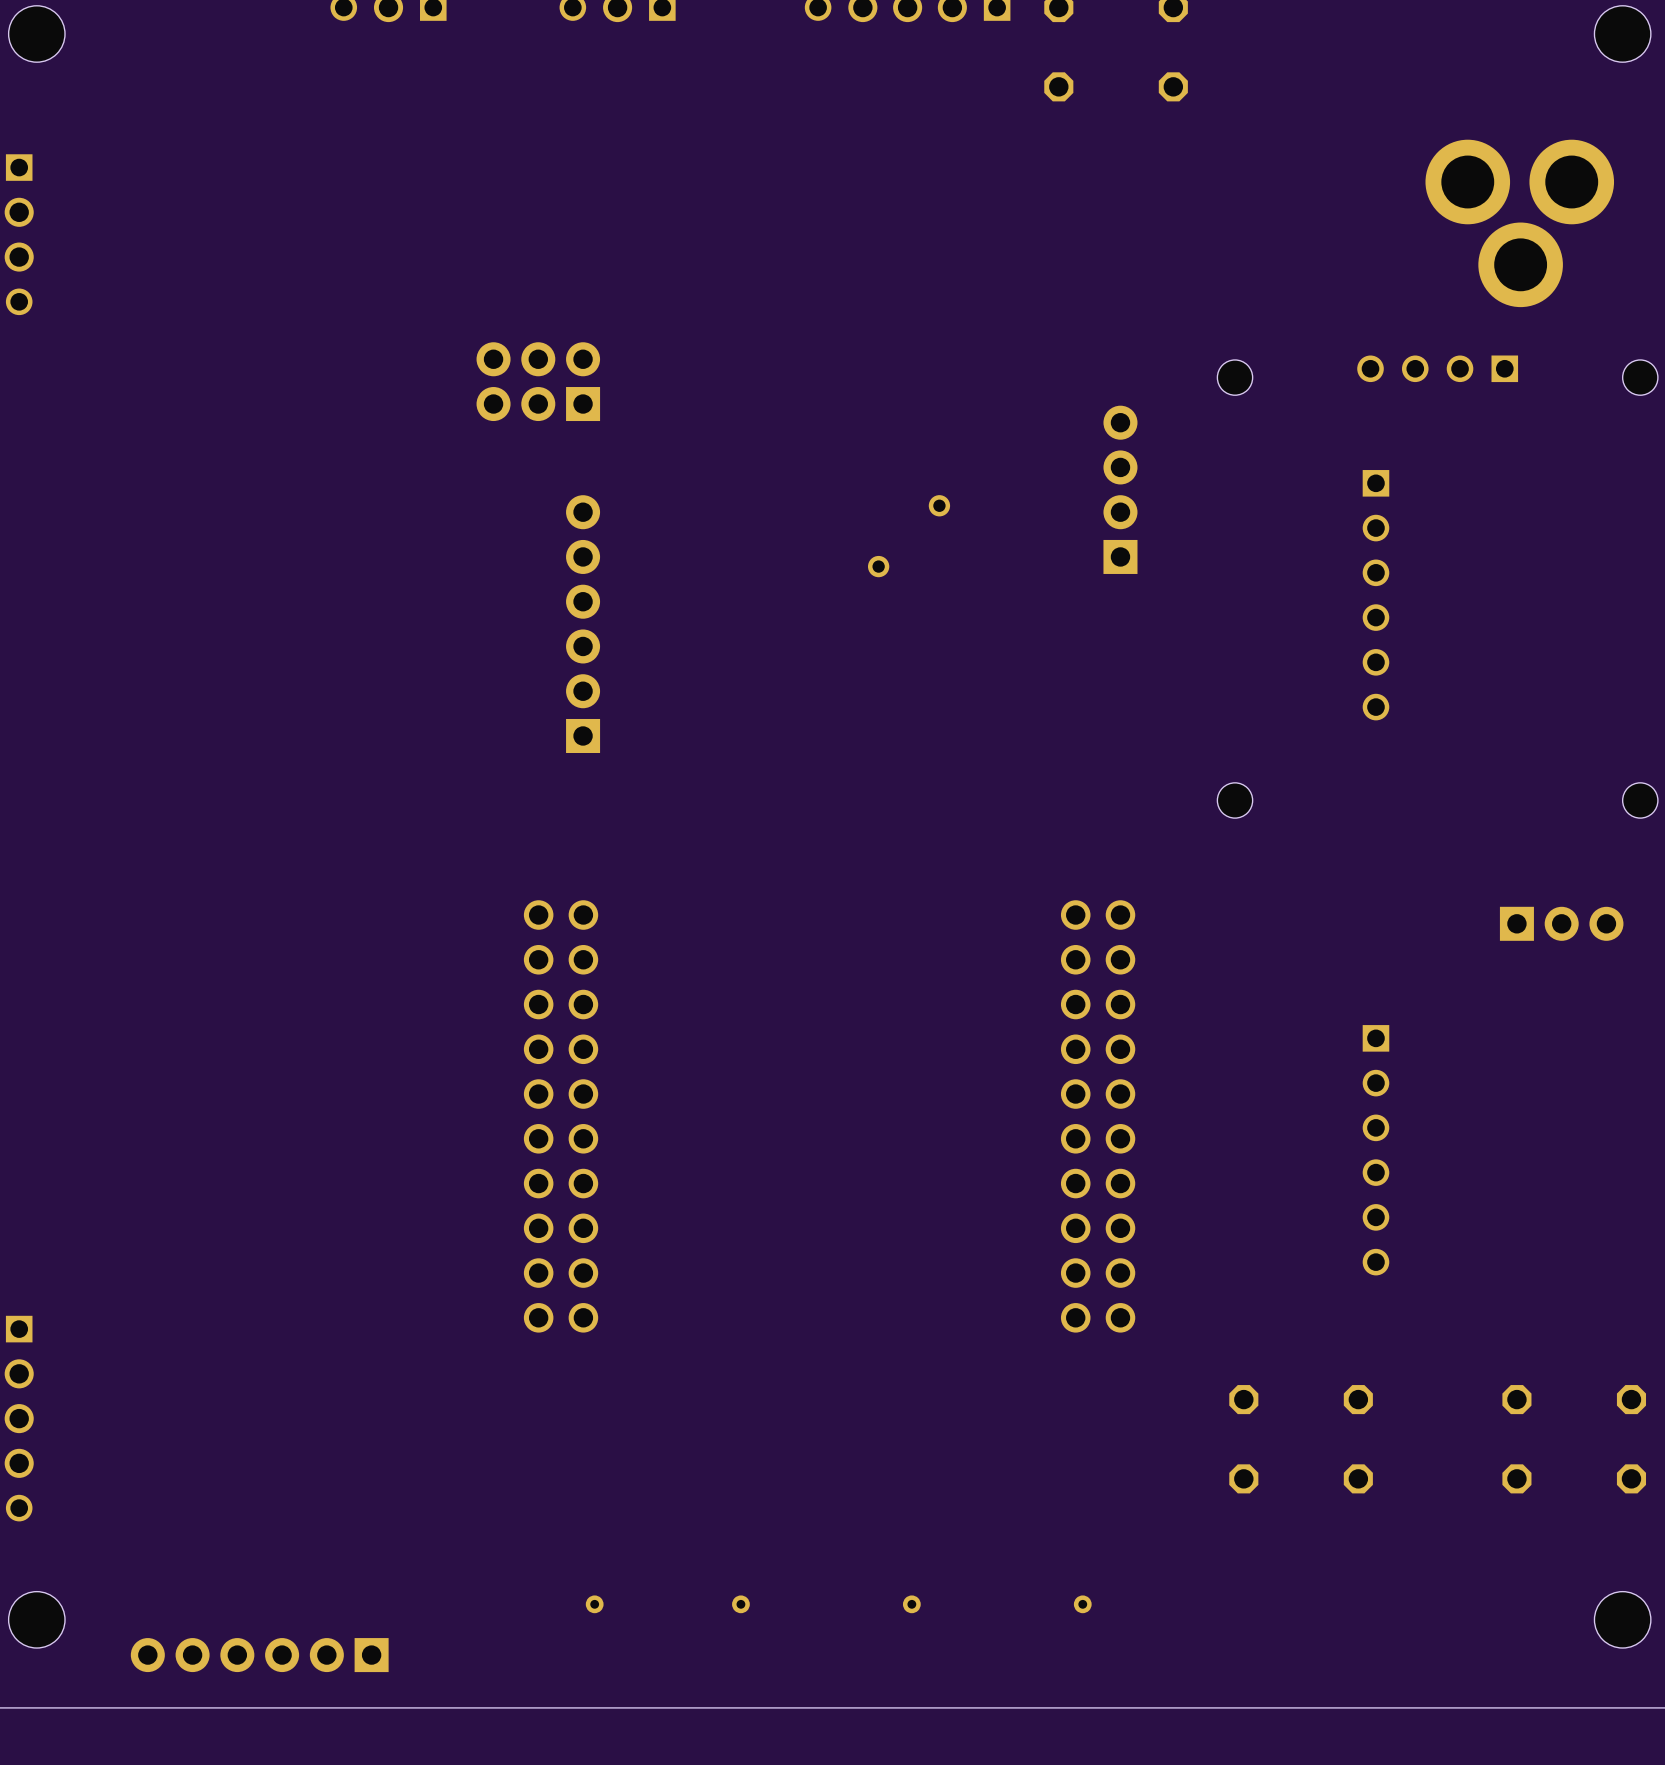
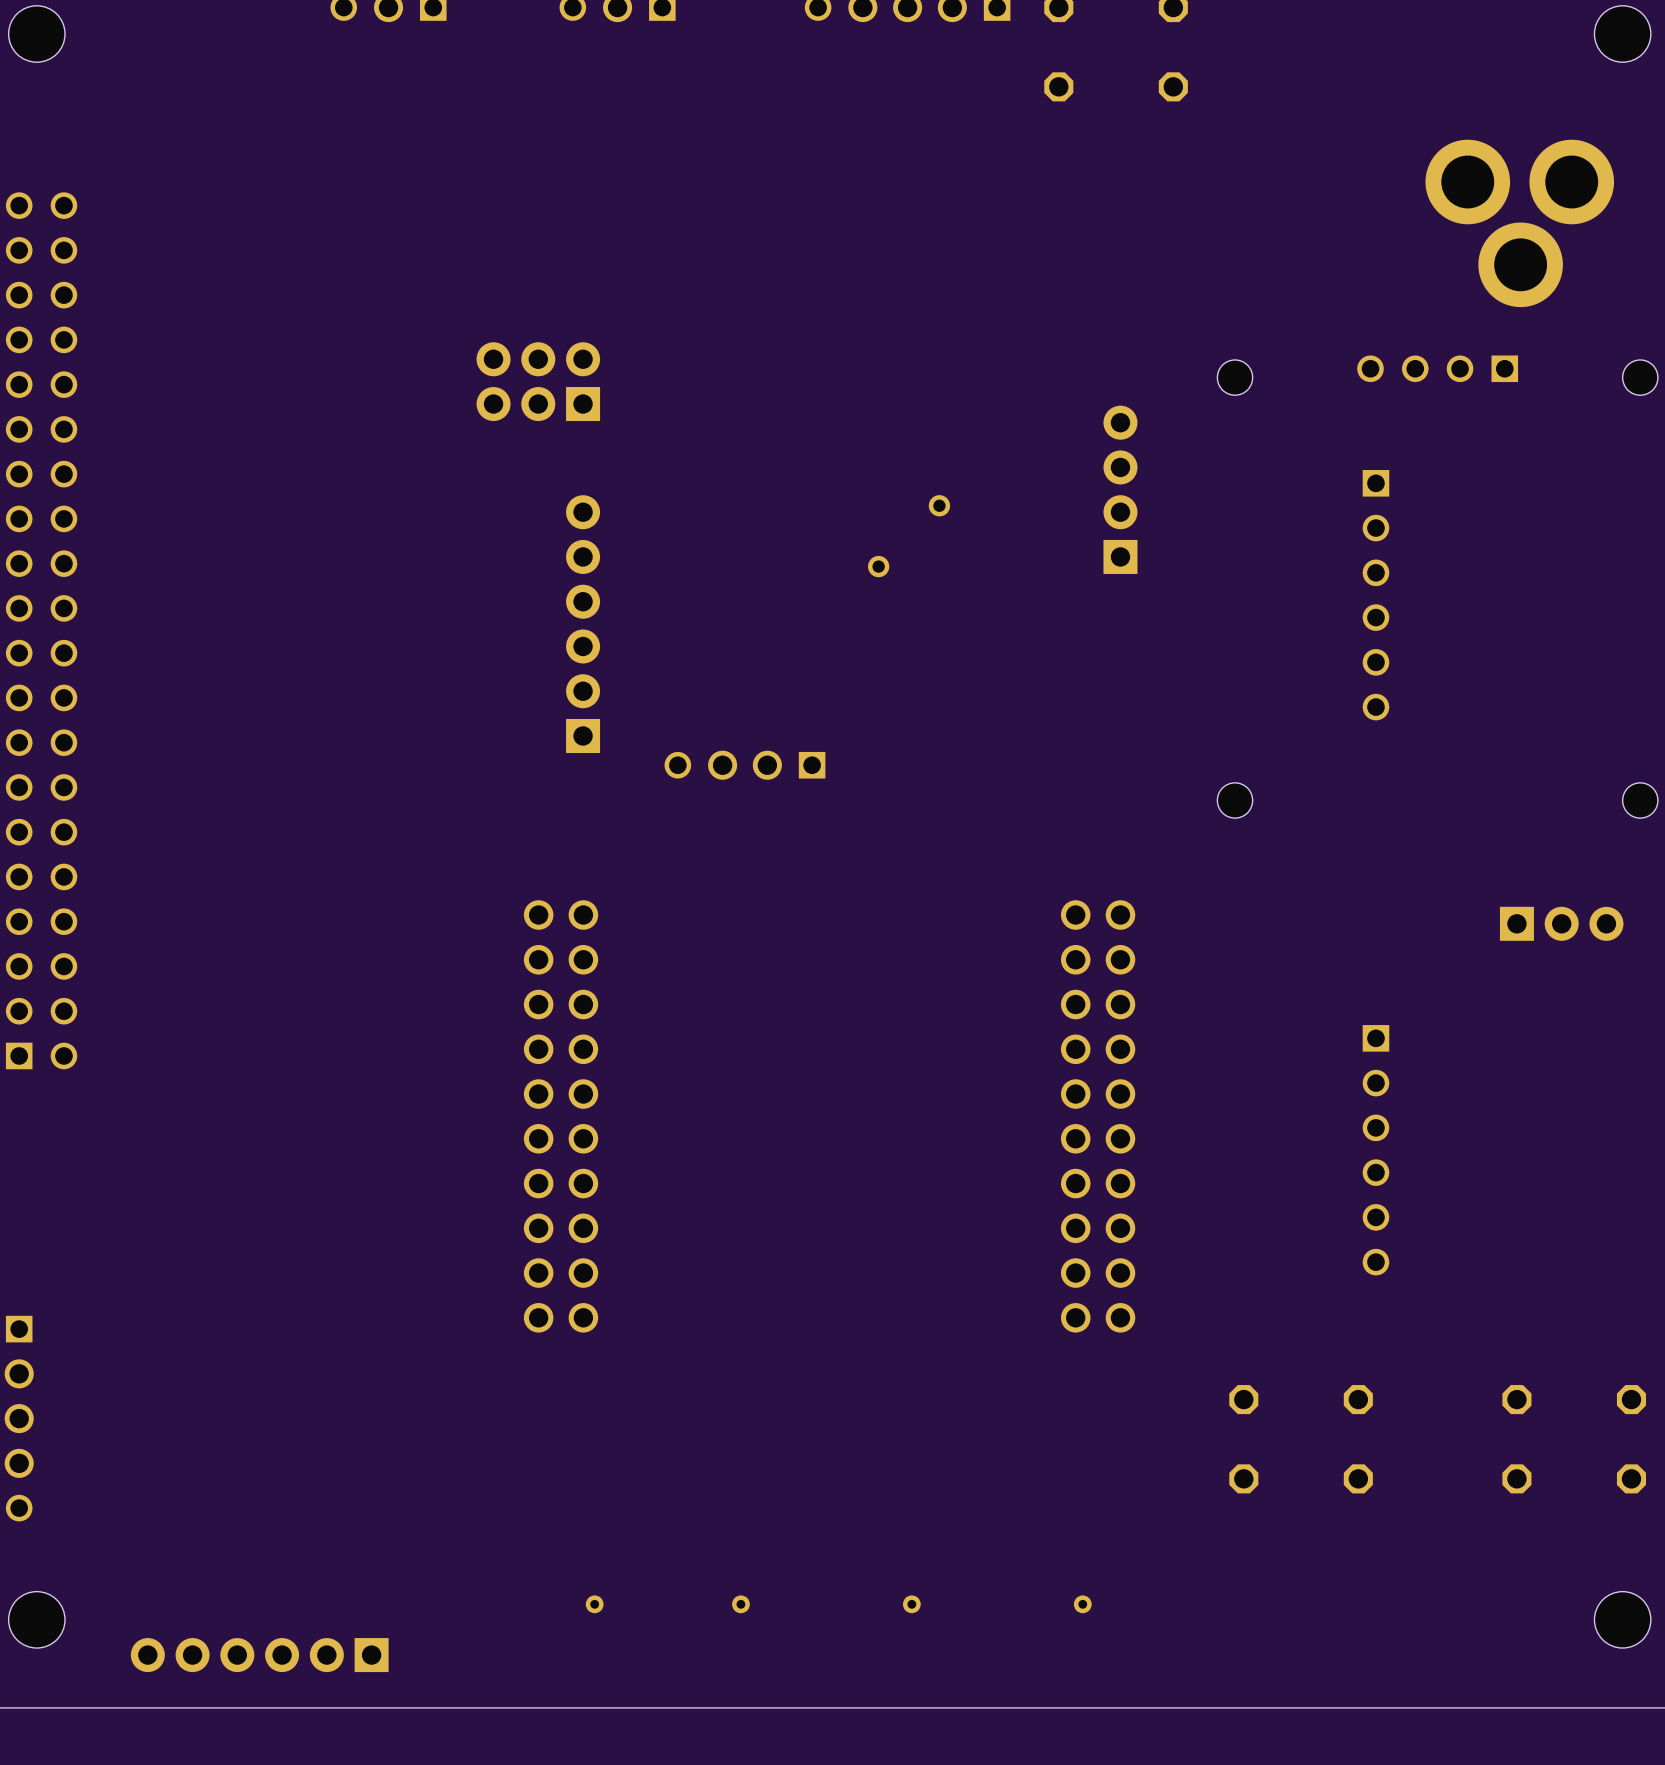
part: (19, 234) -> none
part: none -> (41, 630)
part: none -> (744, 765)

